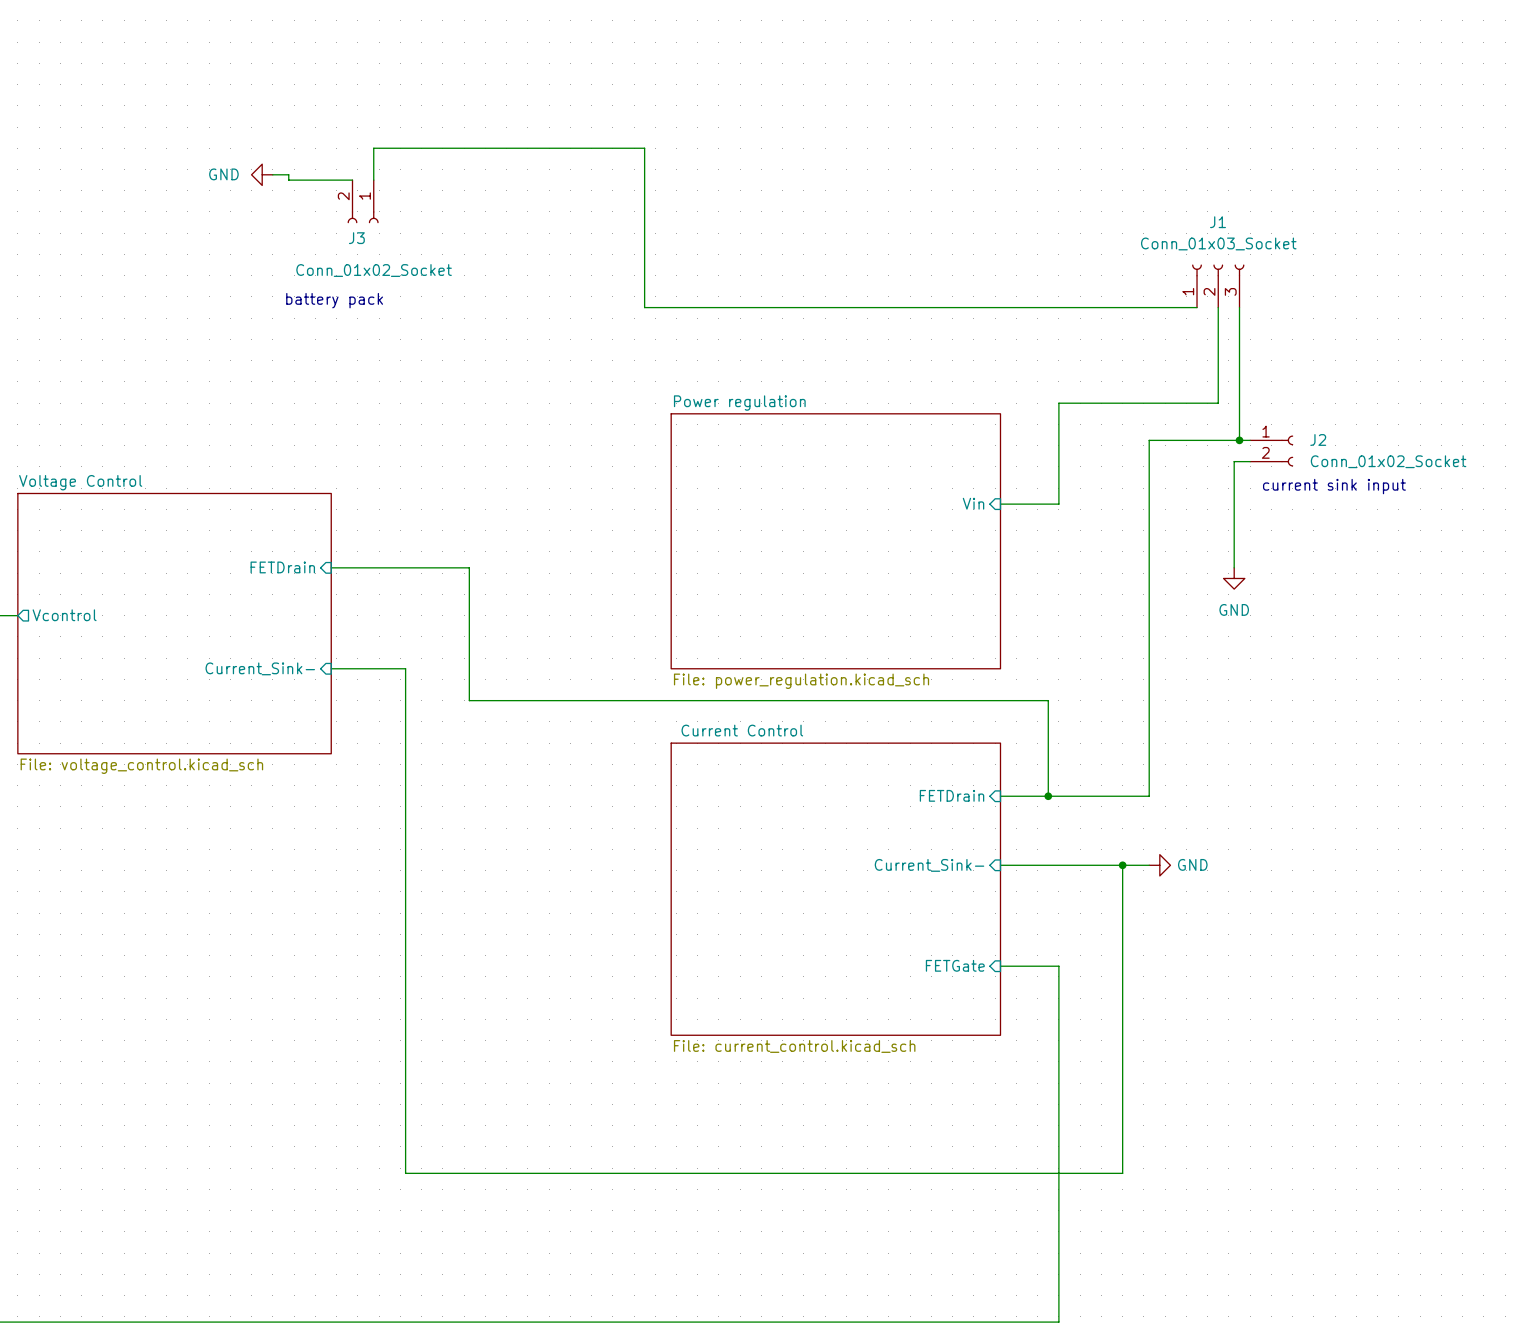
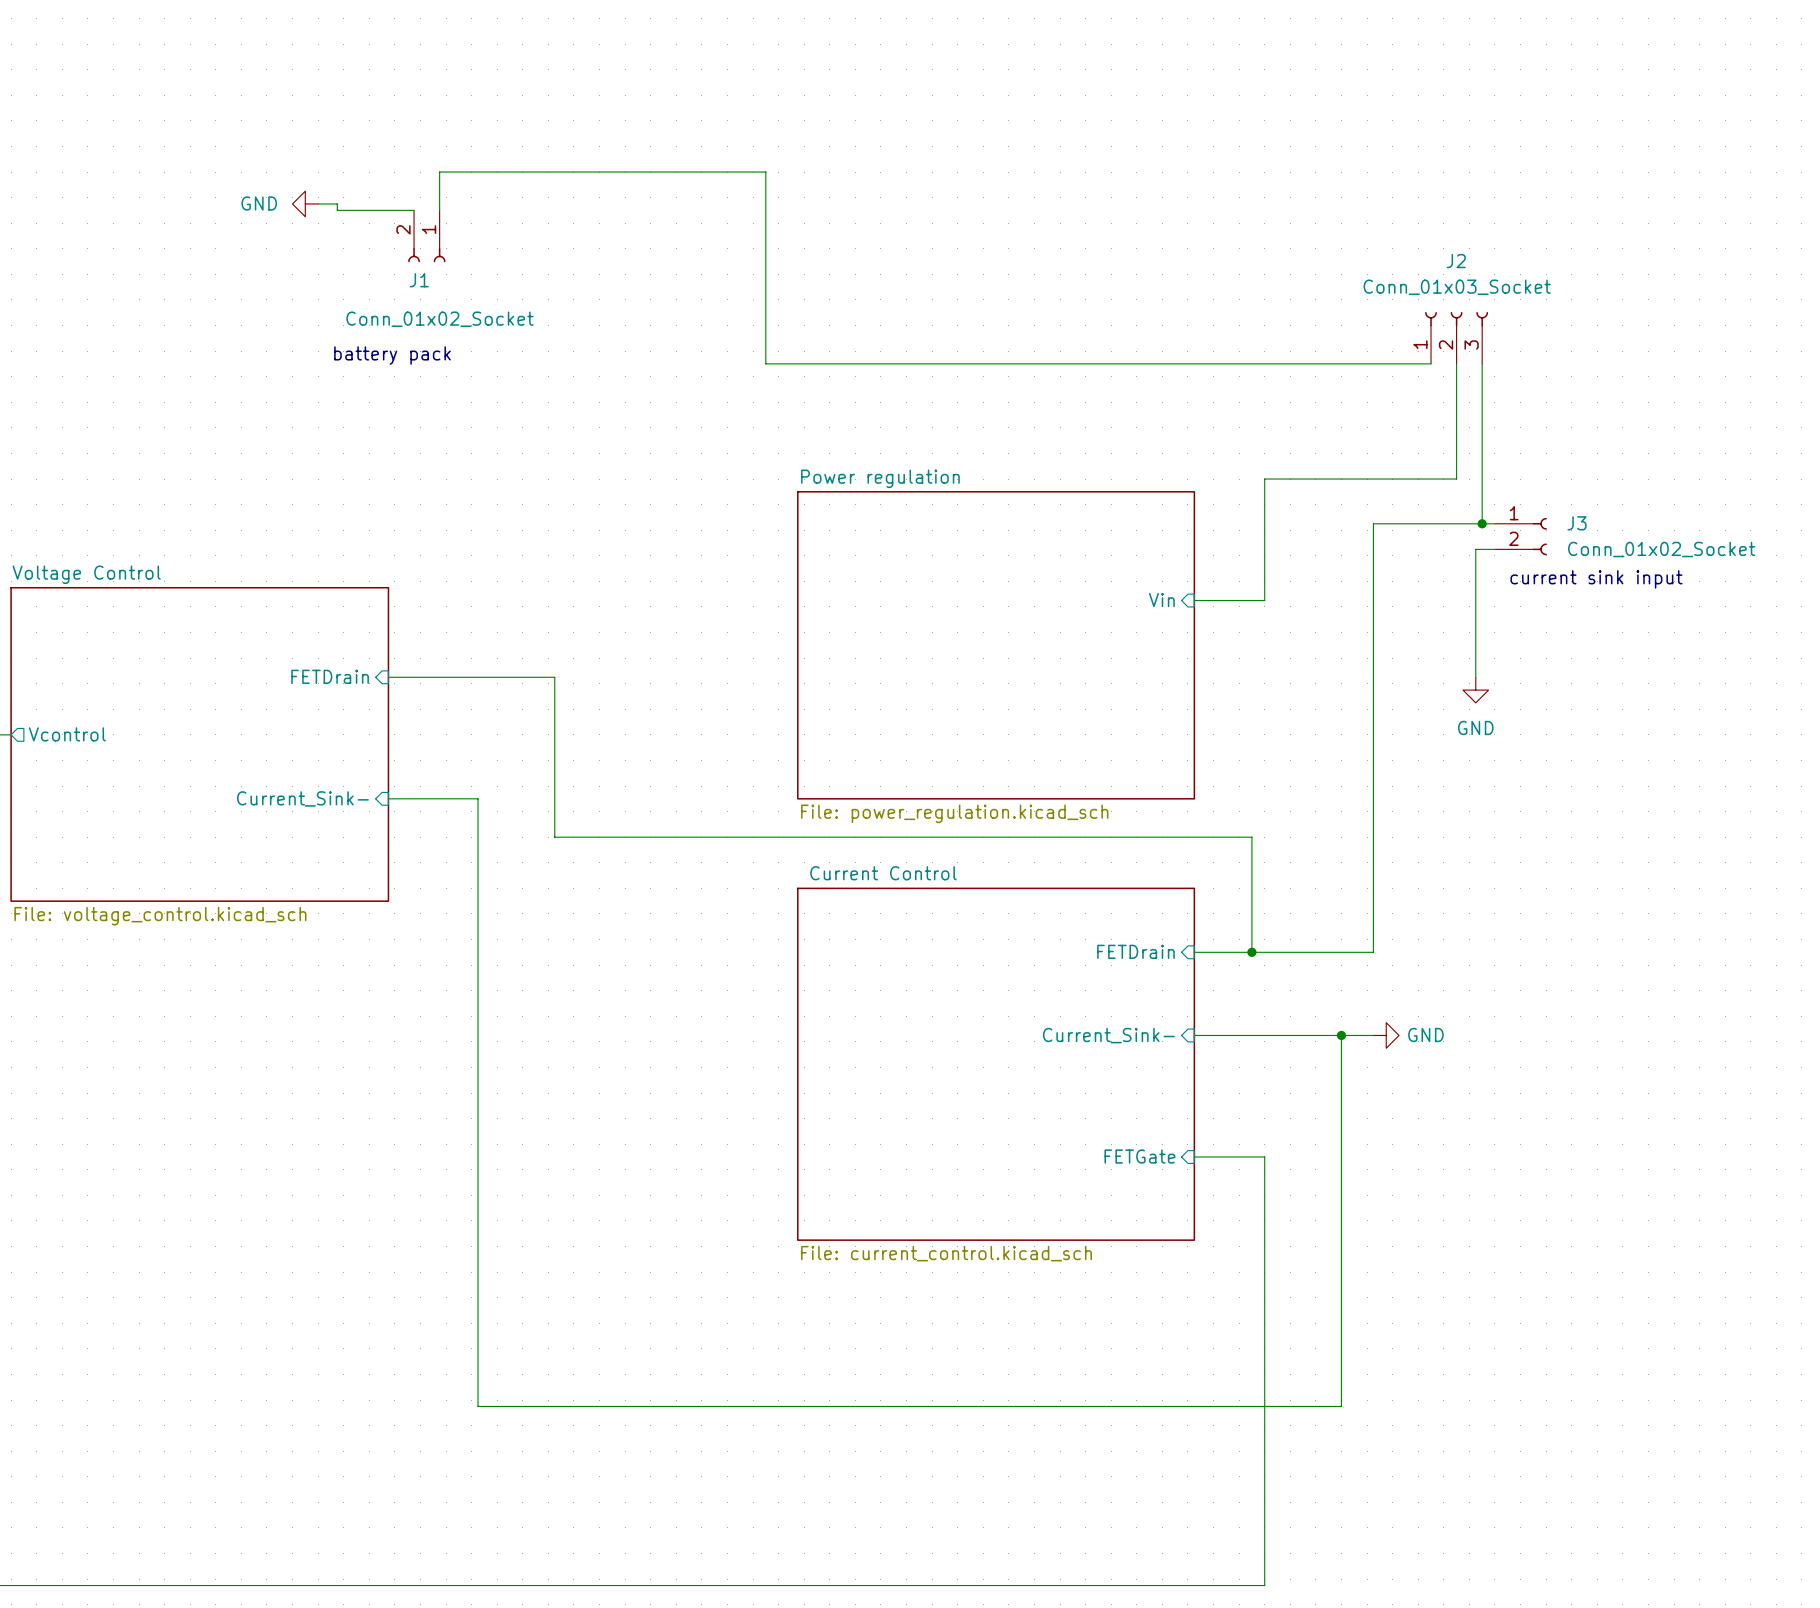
J1 name: J1 (1218, 222) -> J2 (1456, 261)
J3 name: J3 (356, 238) -> J1 (419, 280)
J2 name: J2 (1318, 439) -> J3 (1577, 523)

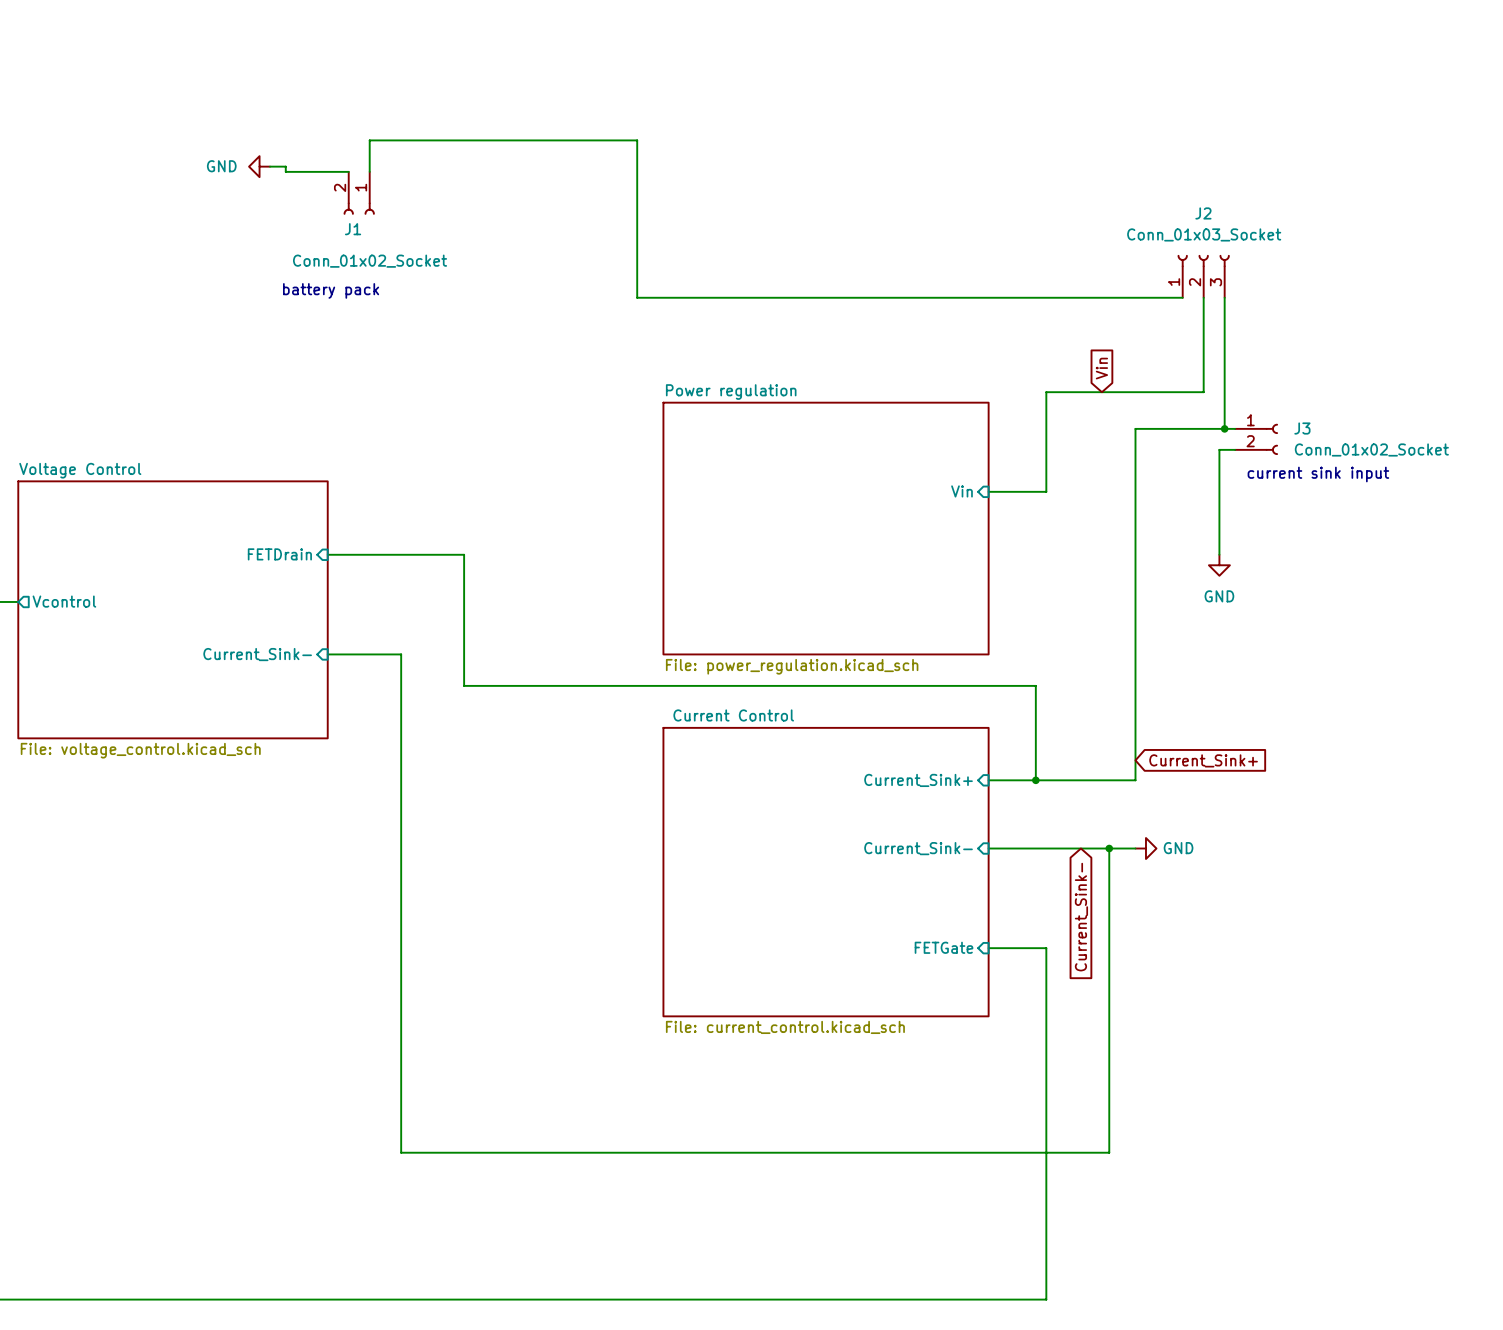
global label: none -> Vin (1101, 368)
global label: none -> Current_Sink+ (1203, 760)
sheet pin: FETDrain (1135, 951) -> Current_Sink+ (918, 780)
global label: none -> Current_Sink- (1081, 917)

